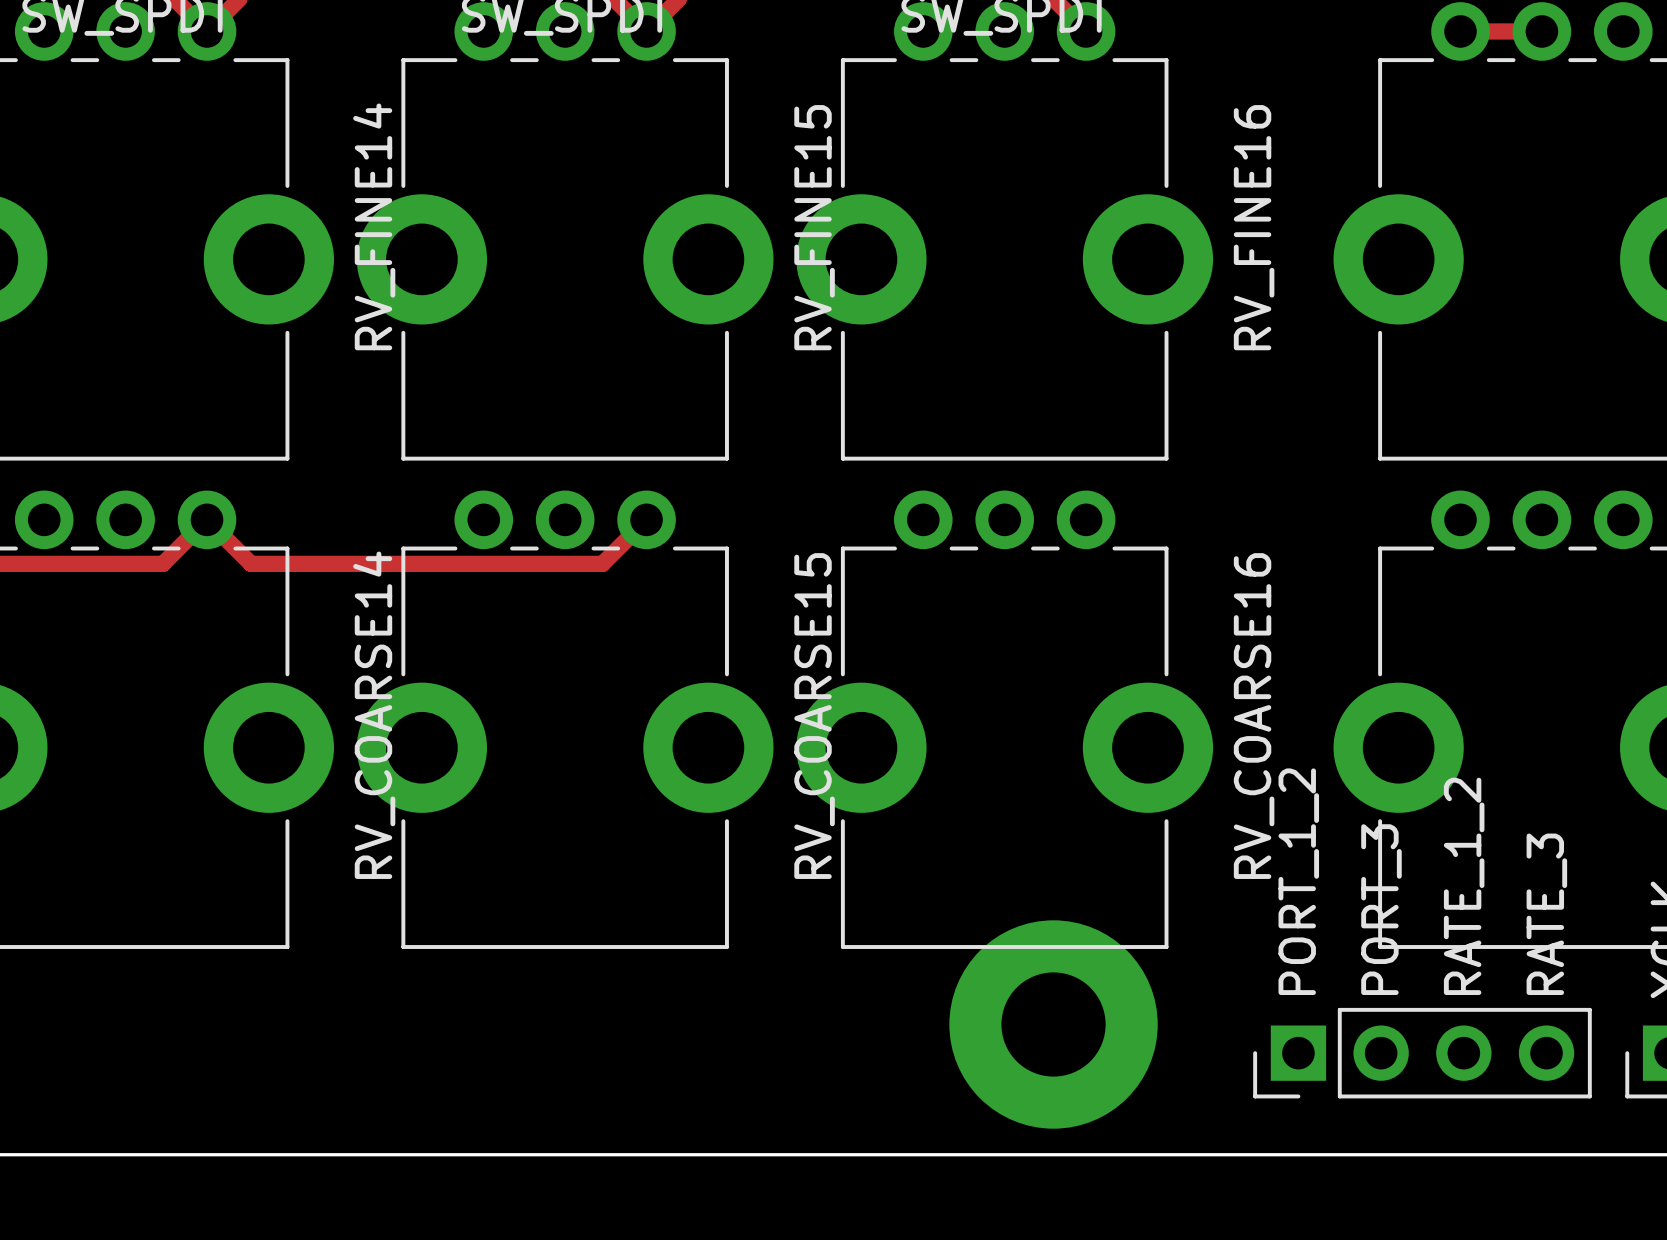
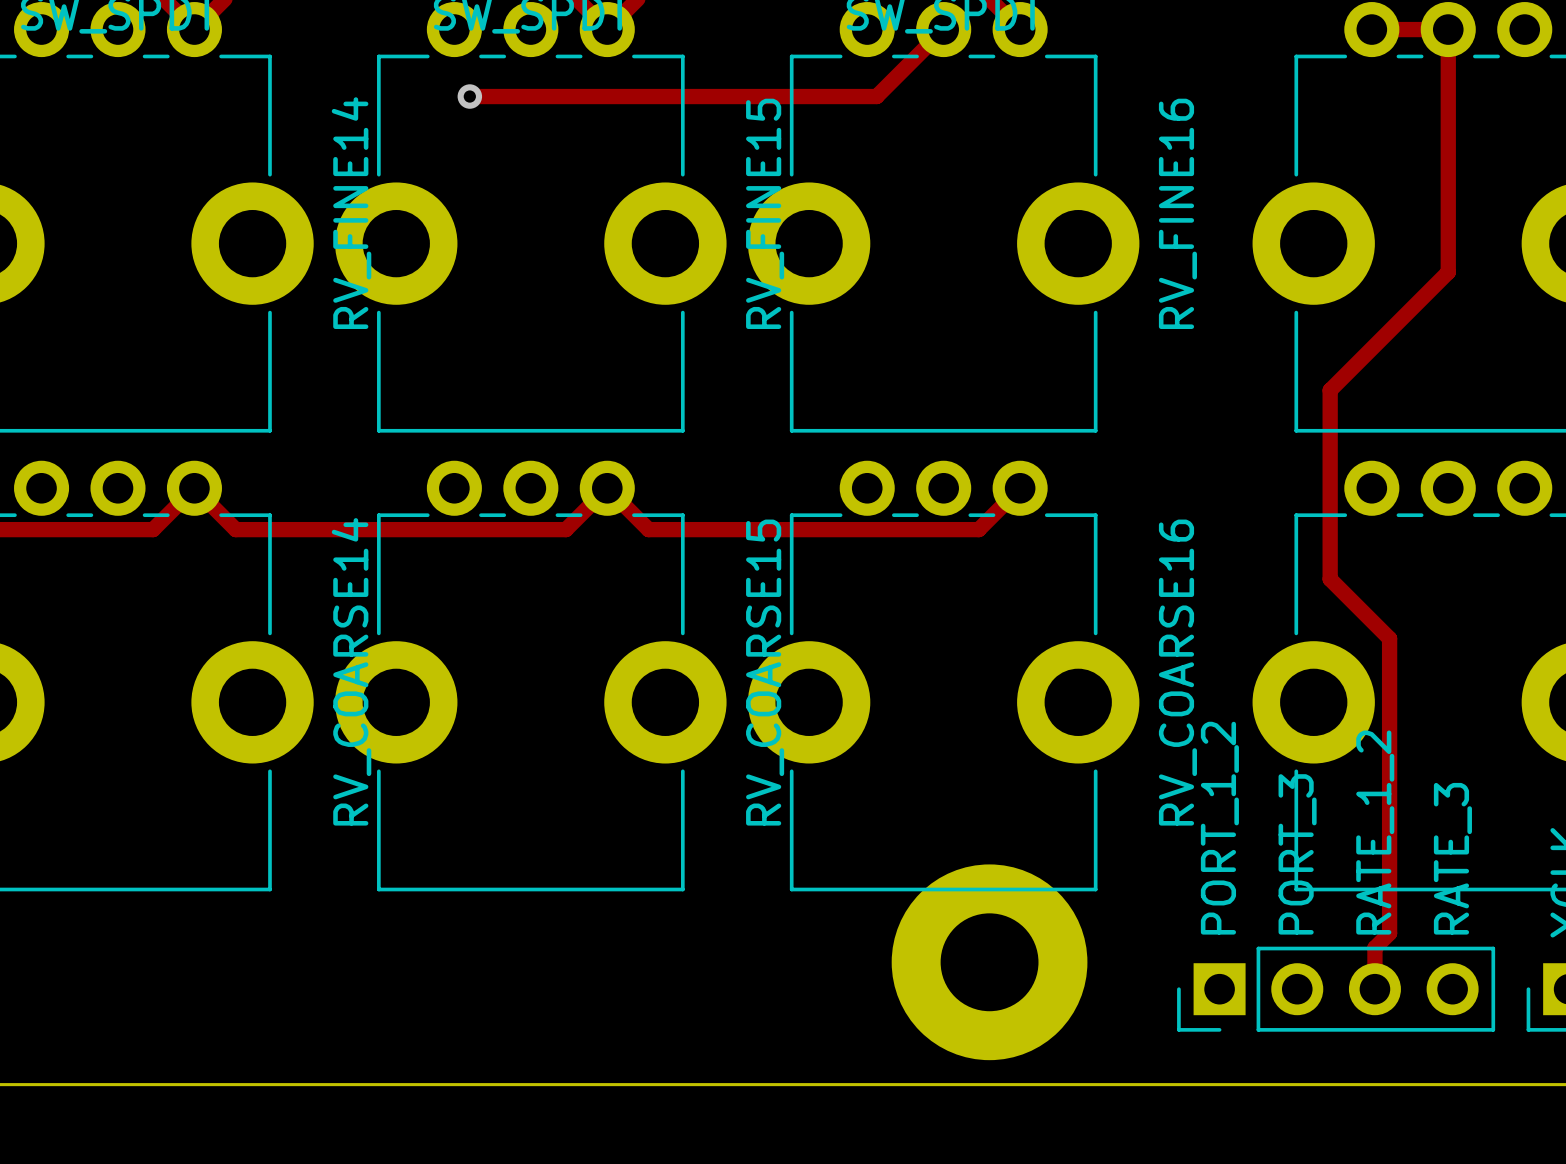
track: none -> (943, 29) (876, 96) (469, 96)
track: none -> (1448, 29) (1448, 272) (1330, 390) (1330, 579) (1389, 638) (1389, 933) (1374, 947) (1374, 989)
via: none -> (469, 96)
track: none -> (607, 488) (648, 529) (978, 529) (1020, 488)

